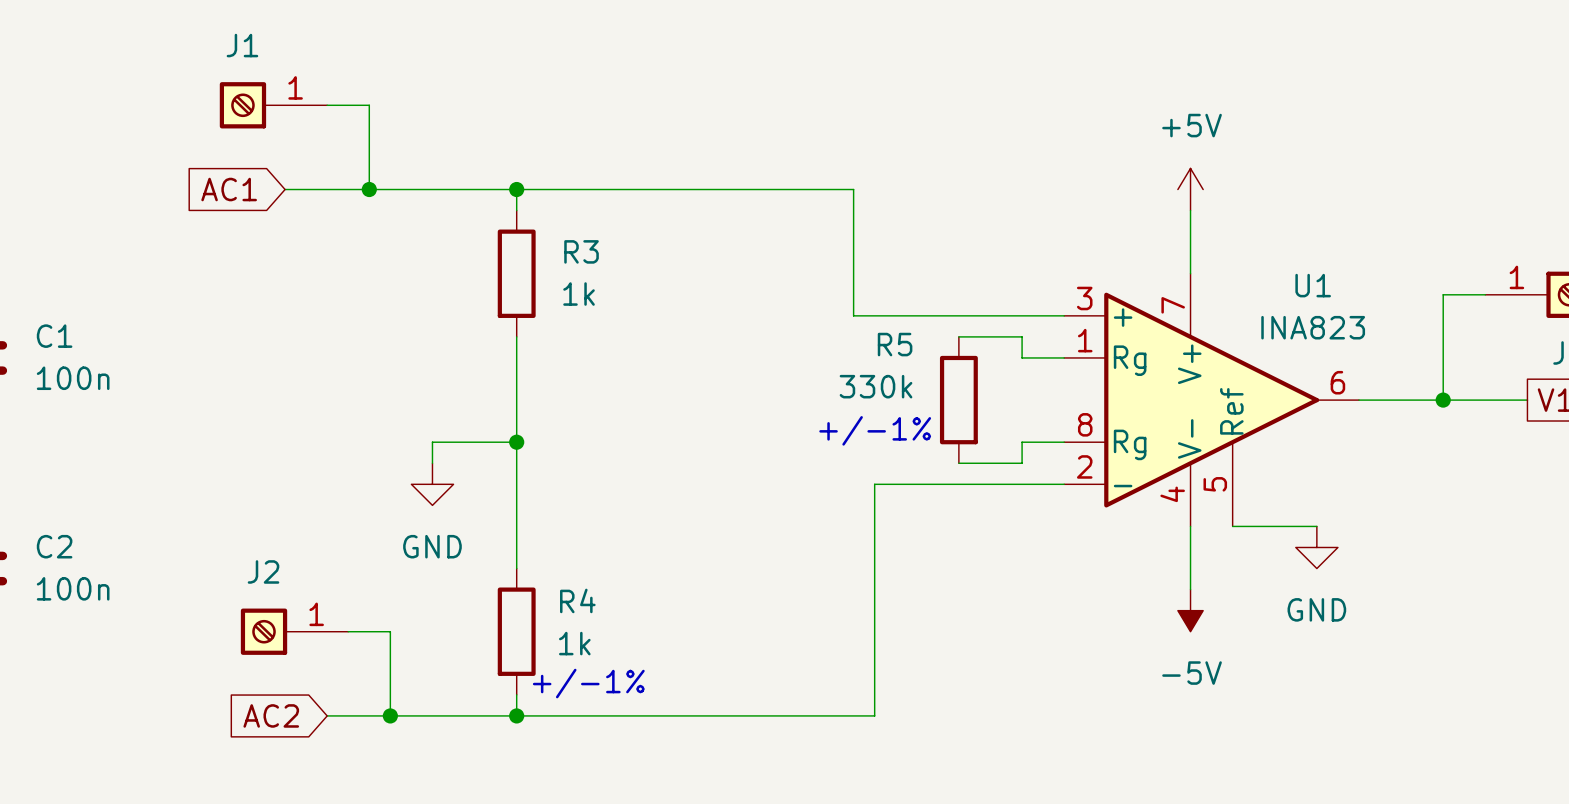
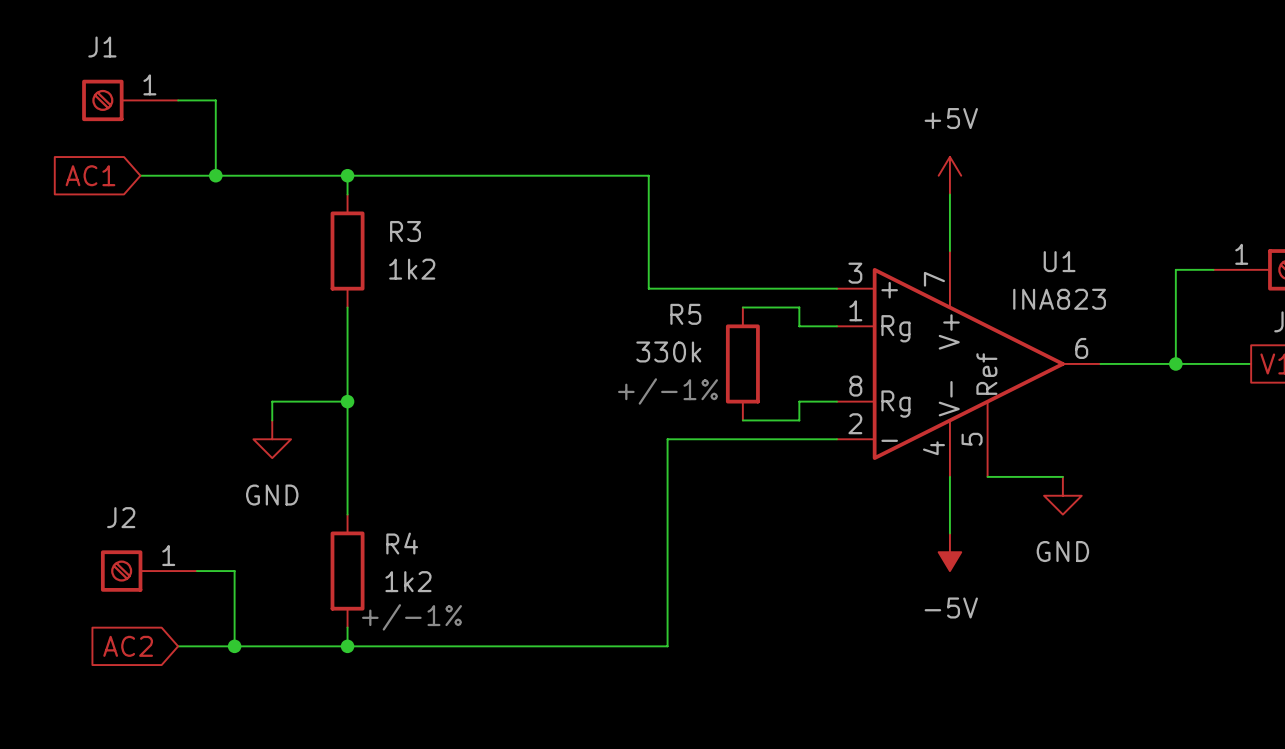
R3 value: 1k (579, 294) -> 1k2 (412, 269)
R4 value: 1k (574, 643) -> 1k2 (408, 581)

